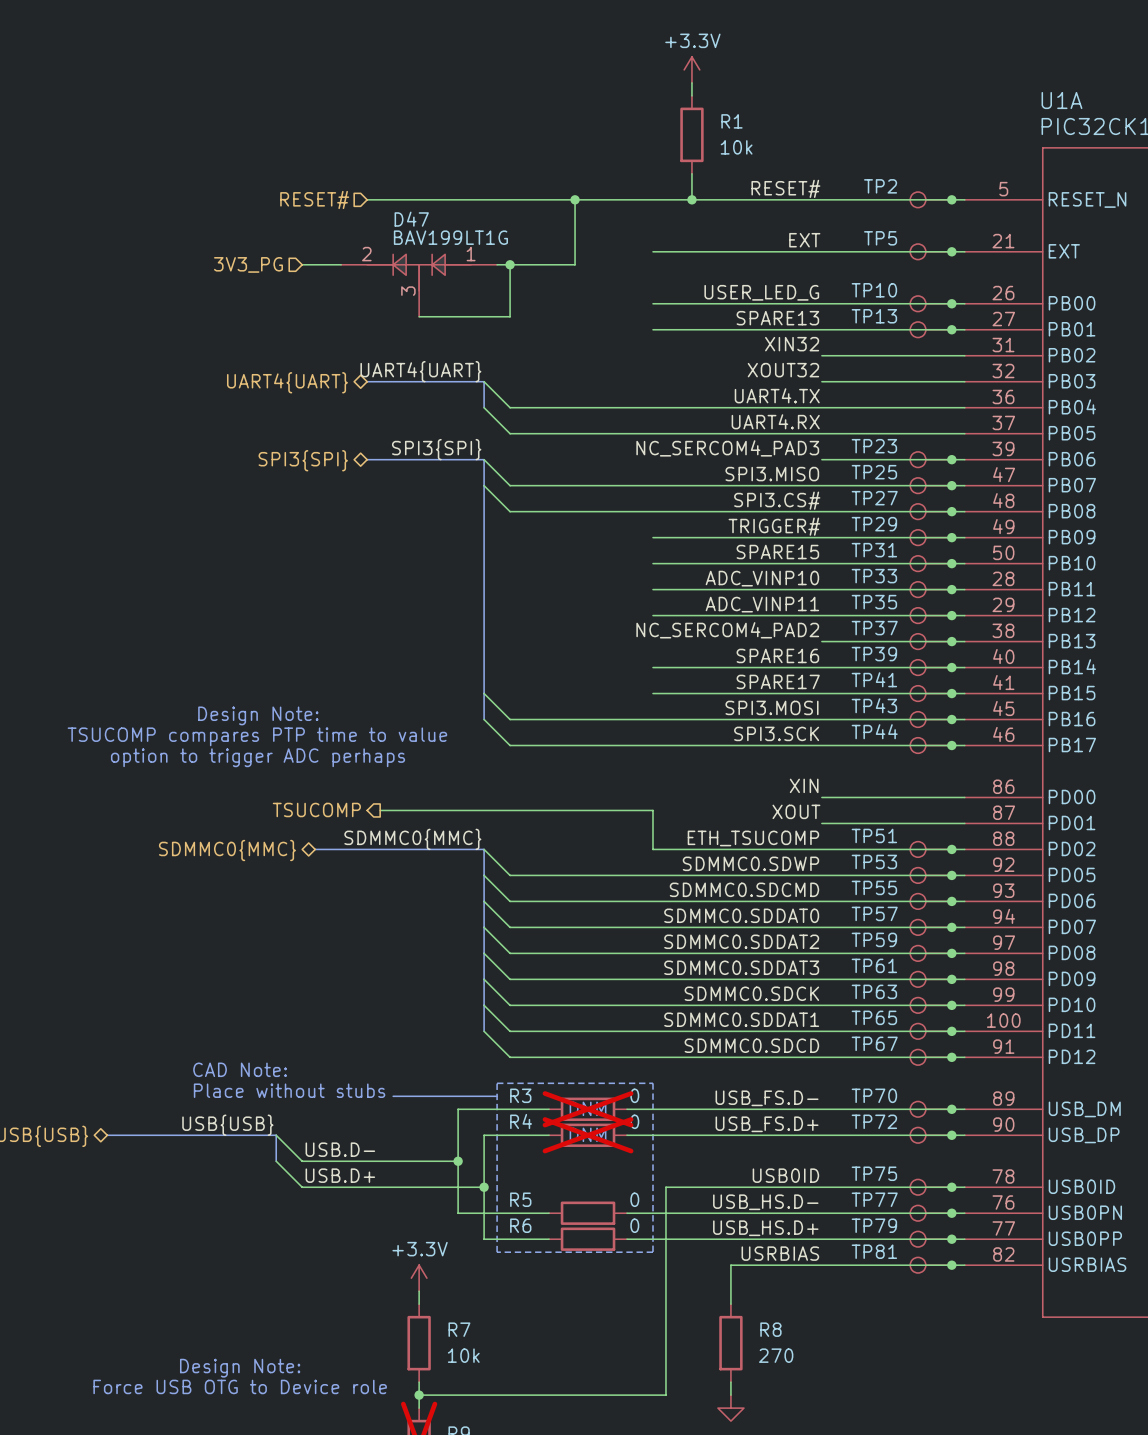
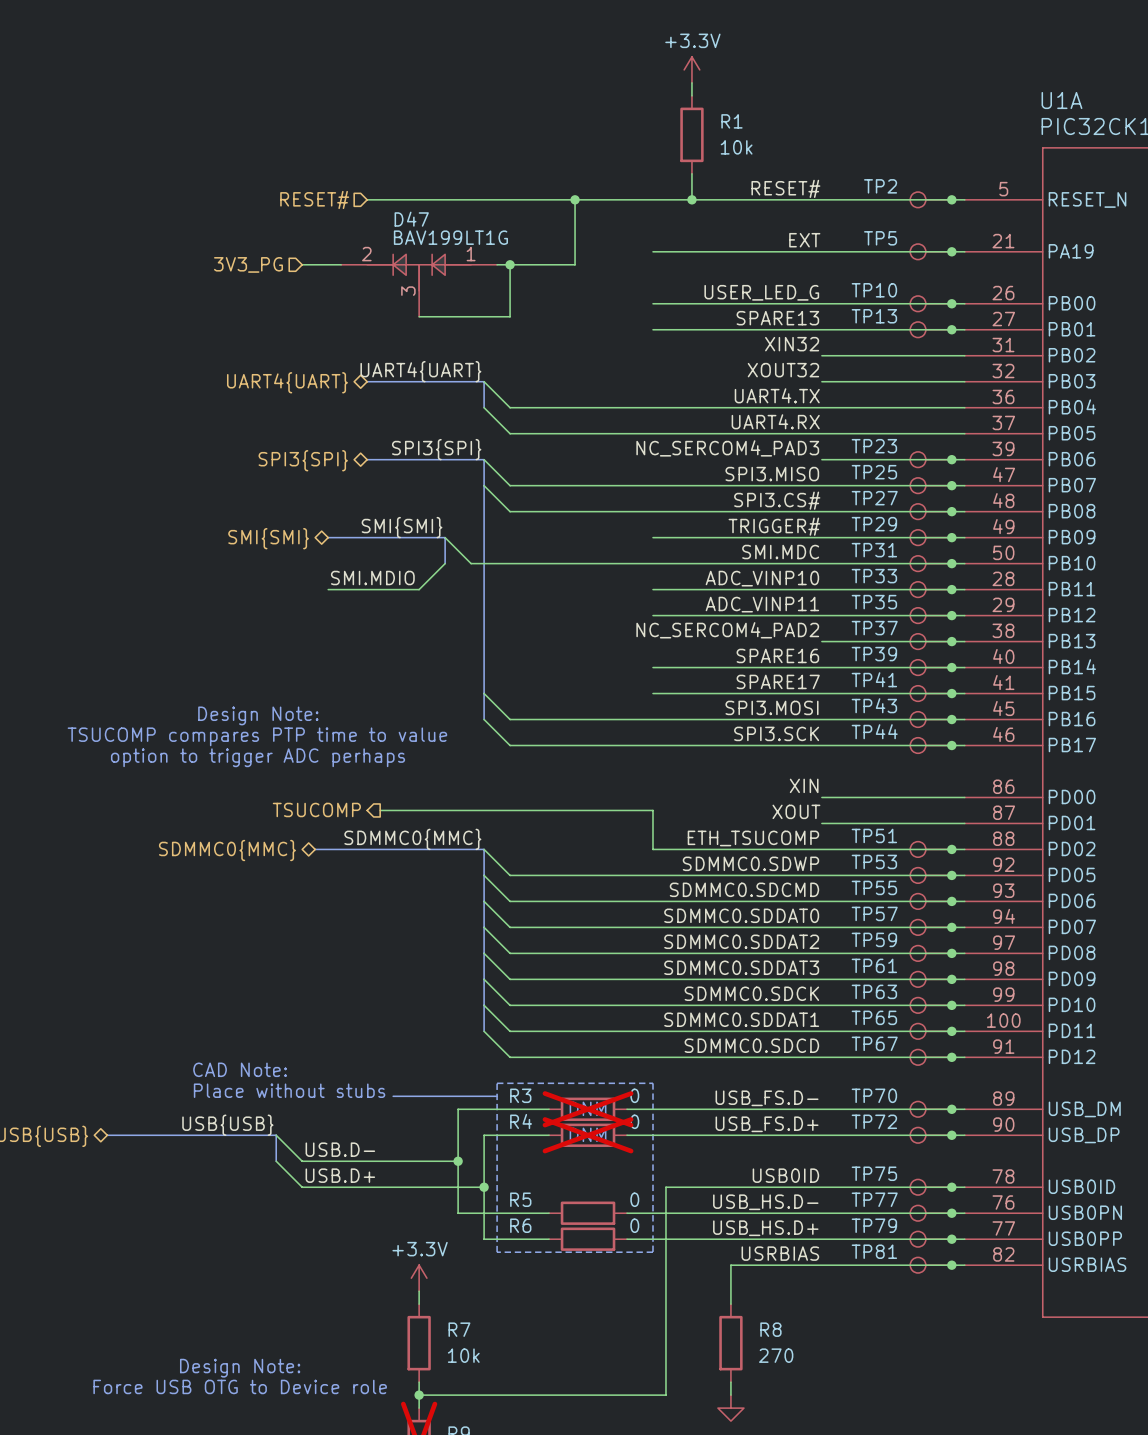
U1A pin name: EXT (1064, 251) -> PA19 (1071, 251)
label: none -> SMI{SMI} (402, 527)
bus: none -> (328, 537) (445, 537) (445, 563)
wire: none -> (445, 537) (471, 563) (652, 563)
hierarchical label: none -> SMI{SMI} (268, 538)
label: SPARE15 (777, 552) -> SMI.MDC (780, 552)
wire: none -> (445, 563) (419, 589) (328, 589)
label: none -> SMI.MDIO (372, 578)

